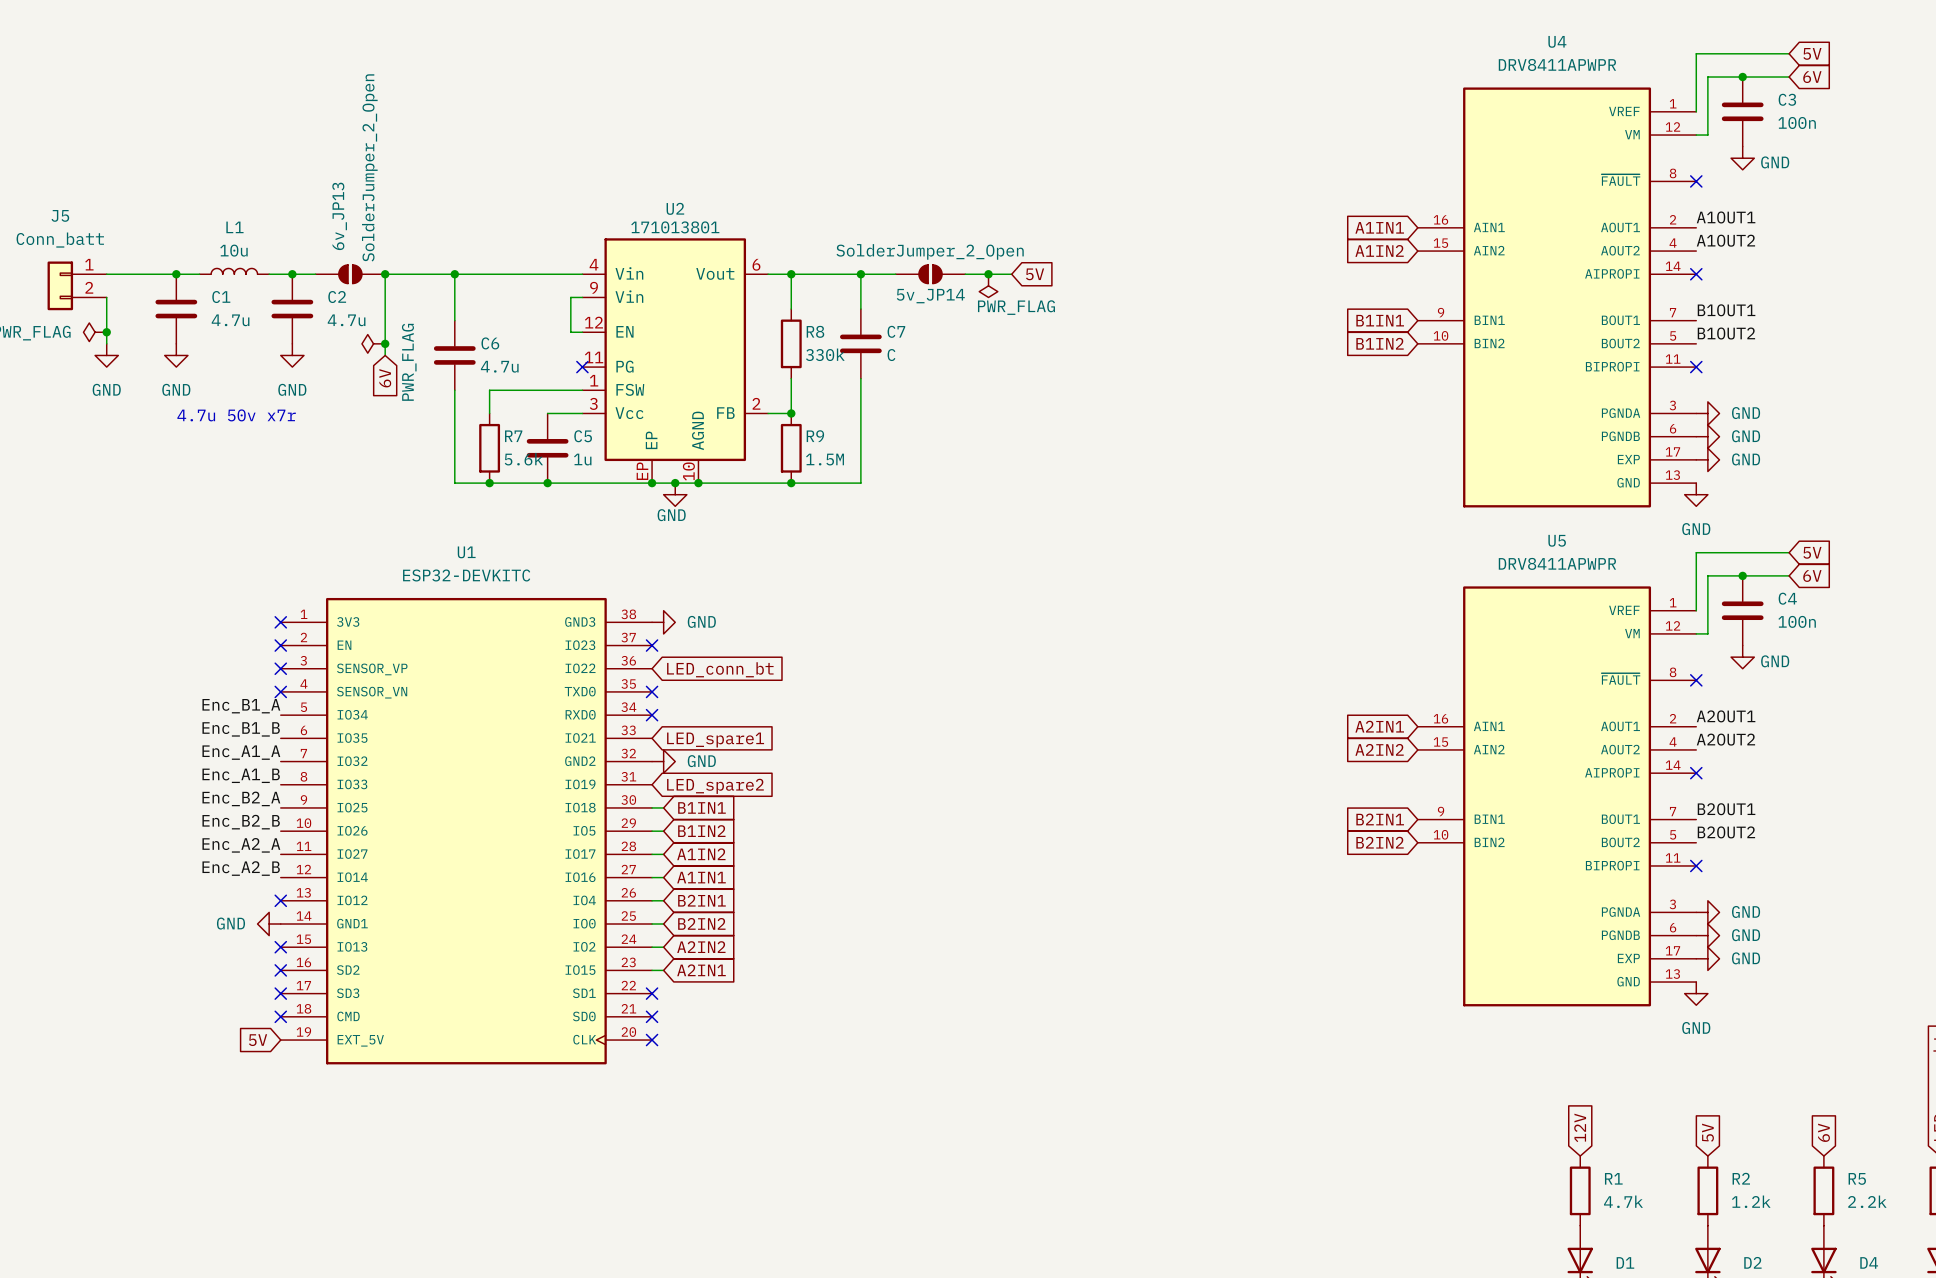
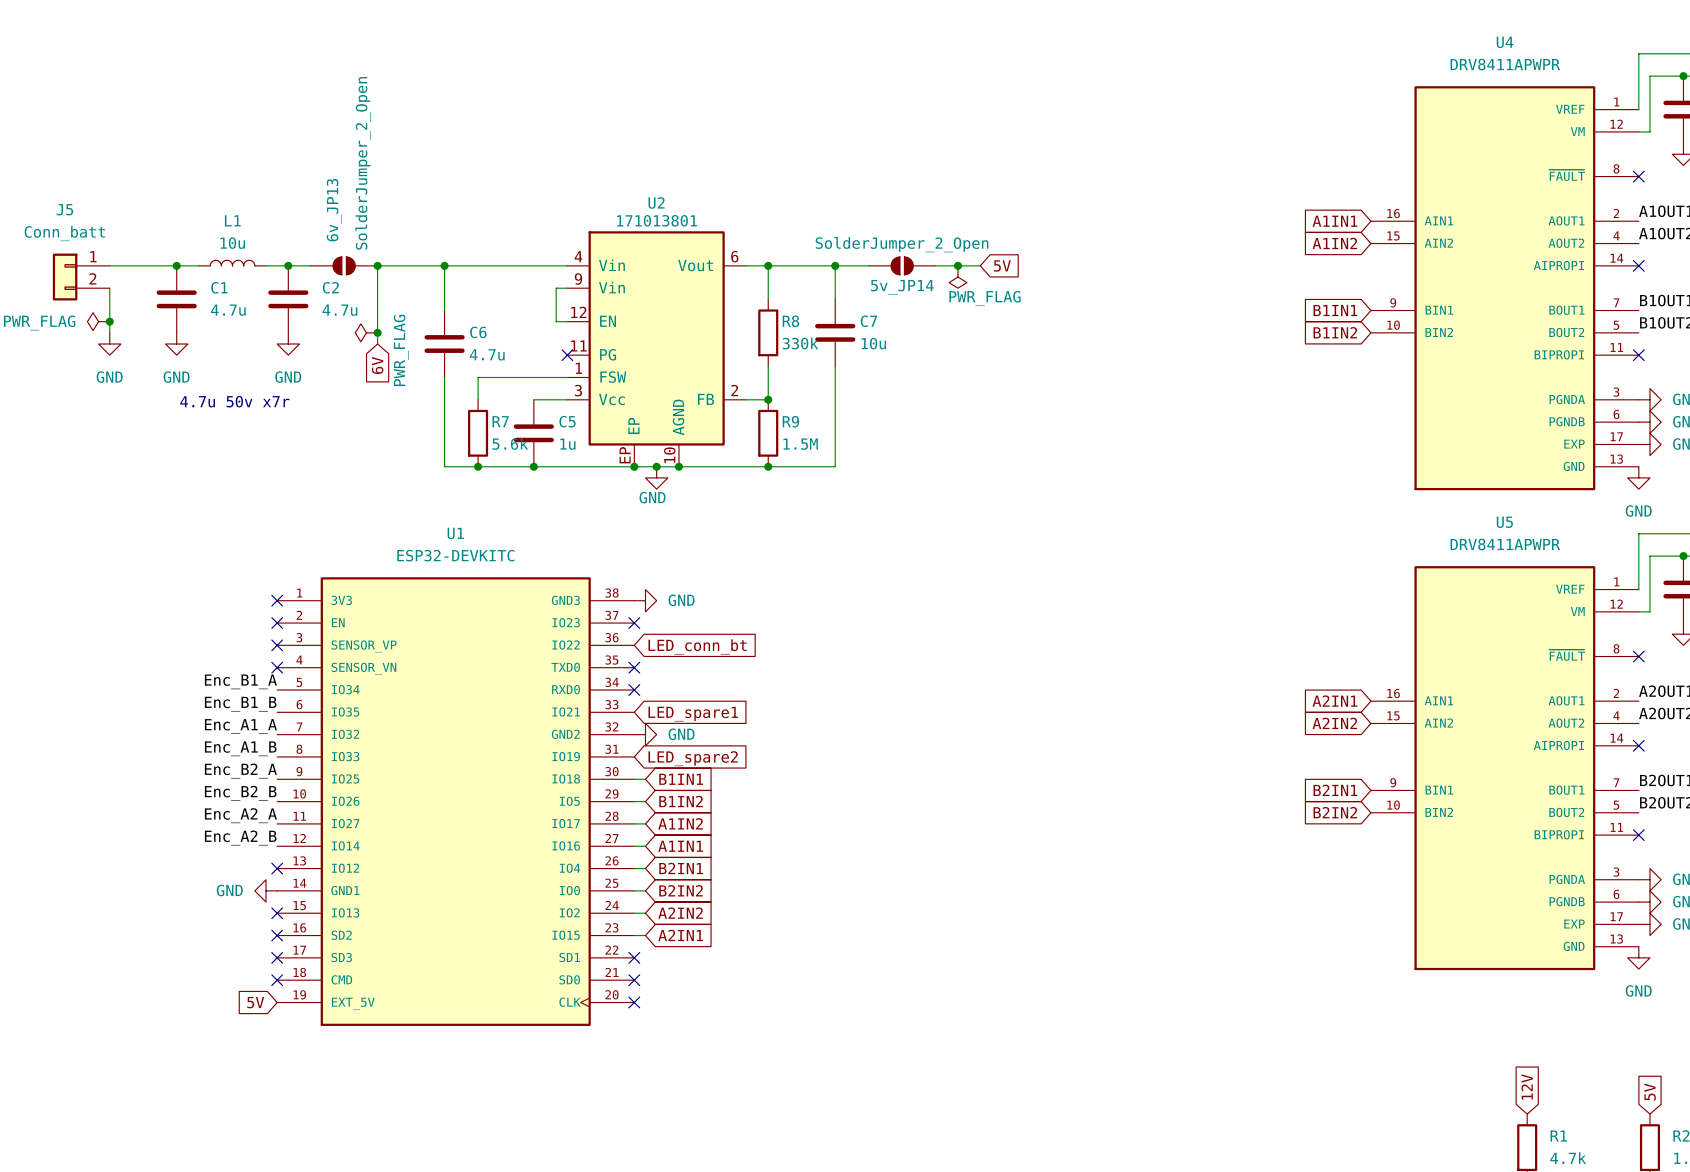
C7 value: C (891, 355) -> 10u (873, 343)

